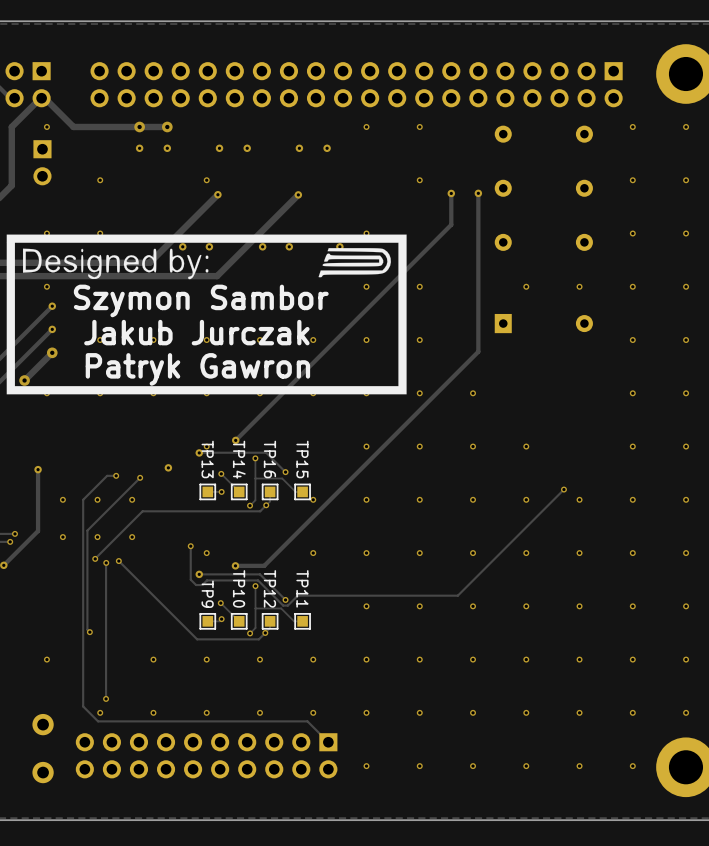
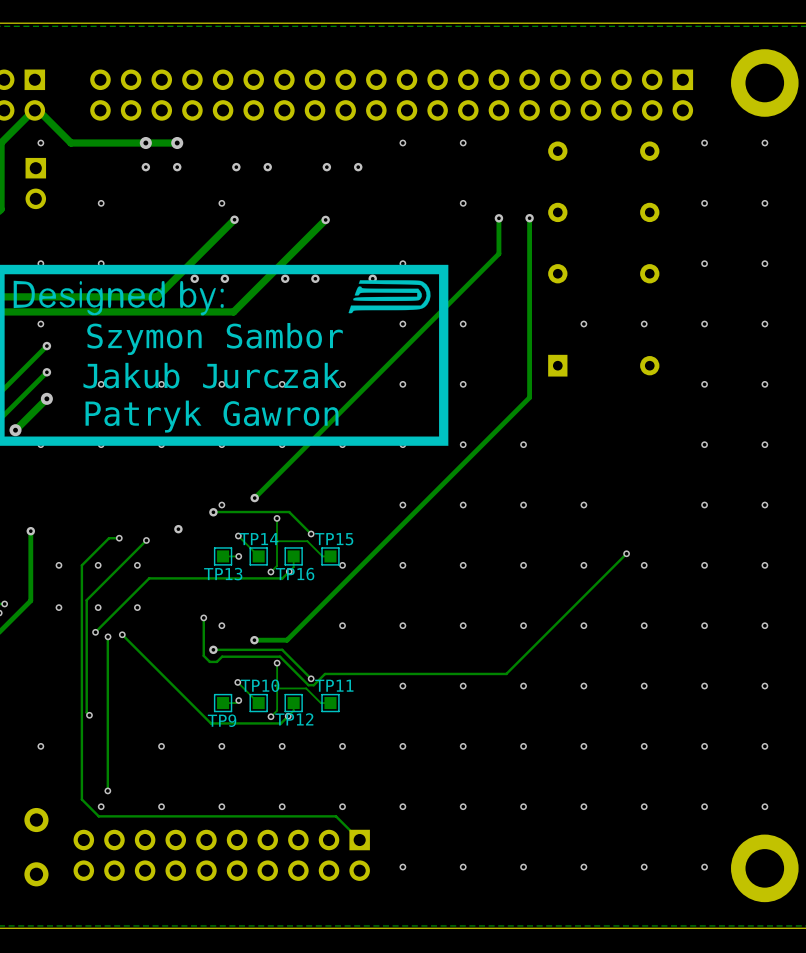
TP13 name rotation: 0° (207, 459) -> 90° counterclockwise (223, 574)
TP13 name position: TP13 (207, 459) -> TP13 (223, 574)
TP14 name rotation: 0° (239, 459) -> 90° counterclockwise (259, 539)
TP16 name rotation: 0° (269, 459) -> 90° counterclockwise (295, 574)
TP16 name position: TP16 (269, 459) -> TP16 (295, 574)
TP15 name rotation: 0° (302, 459) -> 90° counterclockwise (334, 539)
TP10 name rotation: 0° (239, 588) -> 90° counterclockwise (260, 685)
TP12 name rotation: 0° (269, 588) -> 90° counterclockwise (294, 719)
TP12 name position: TP12 (269, 588) -> TP12 (294, 719)
TP11 name rotation: 0° (302, 588) -> 90° counterclockwise (334, 685)
TP9 name rotation: 0° (207, 594) -> 90° counterclockwise (222, 720)
TP9 name position: TP9 (207, 594) -> TP9 (222, 720)

